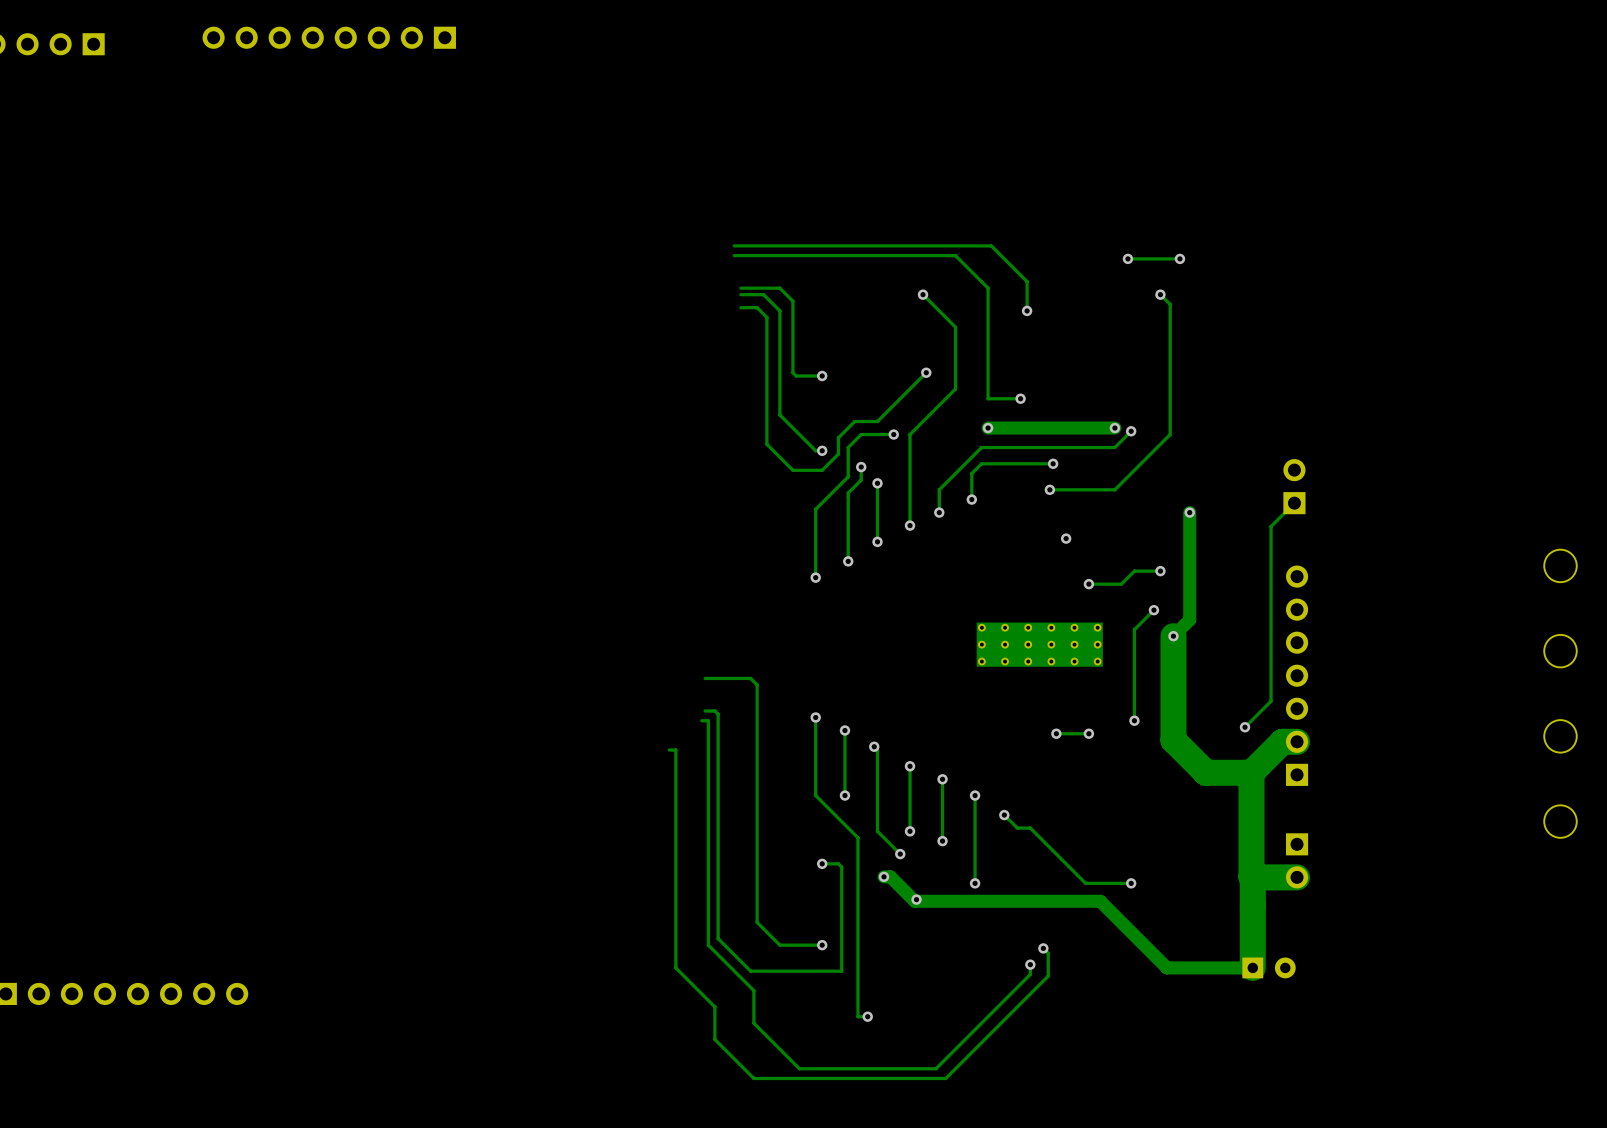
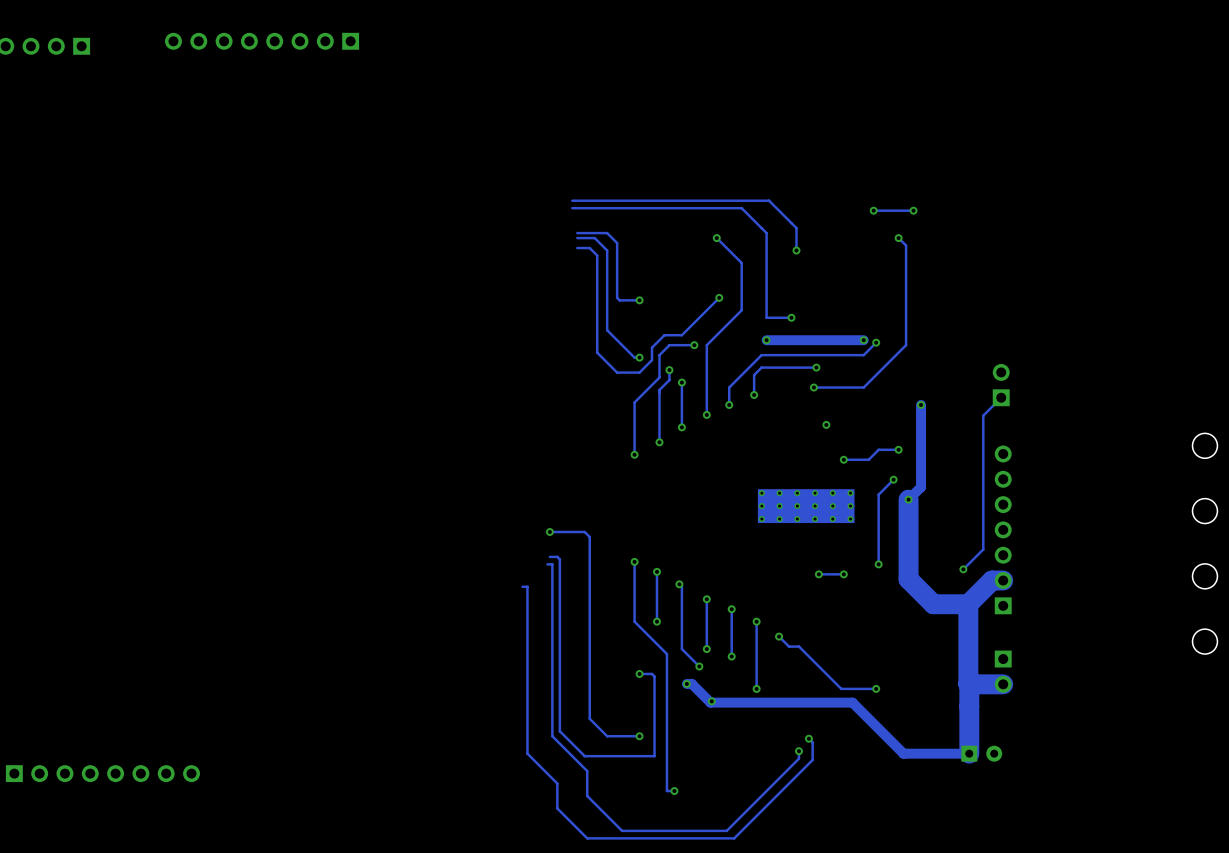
via: none -> (549, 532)

